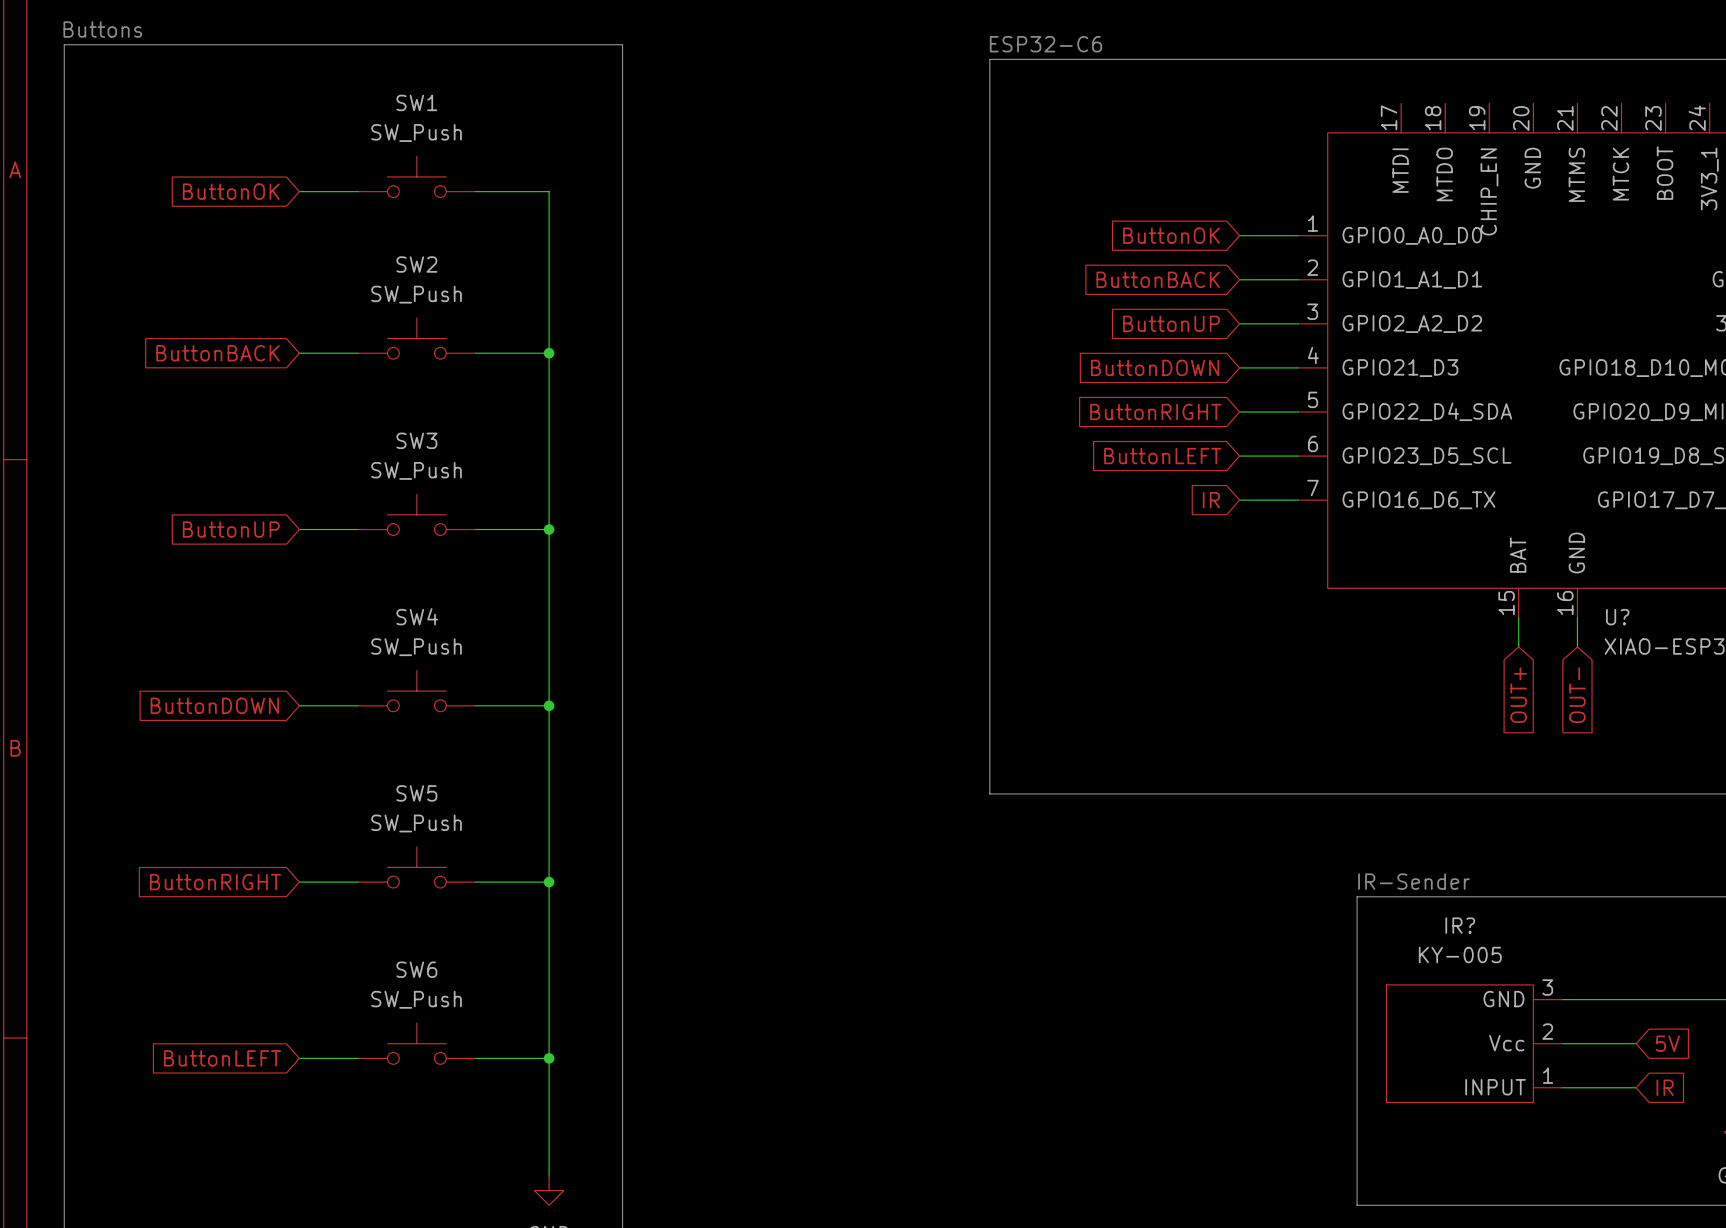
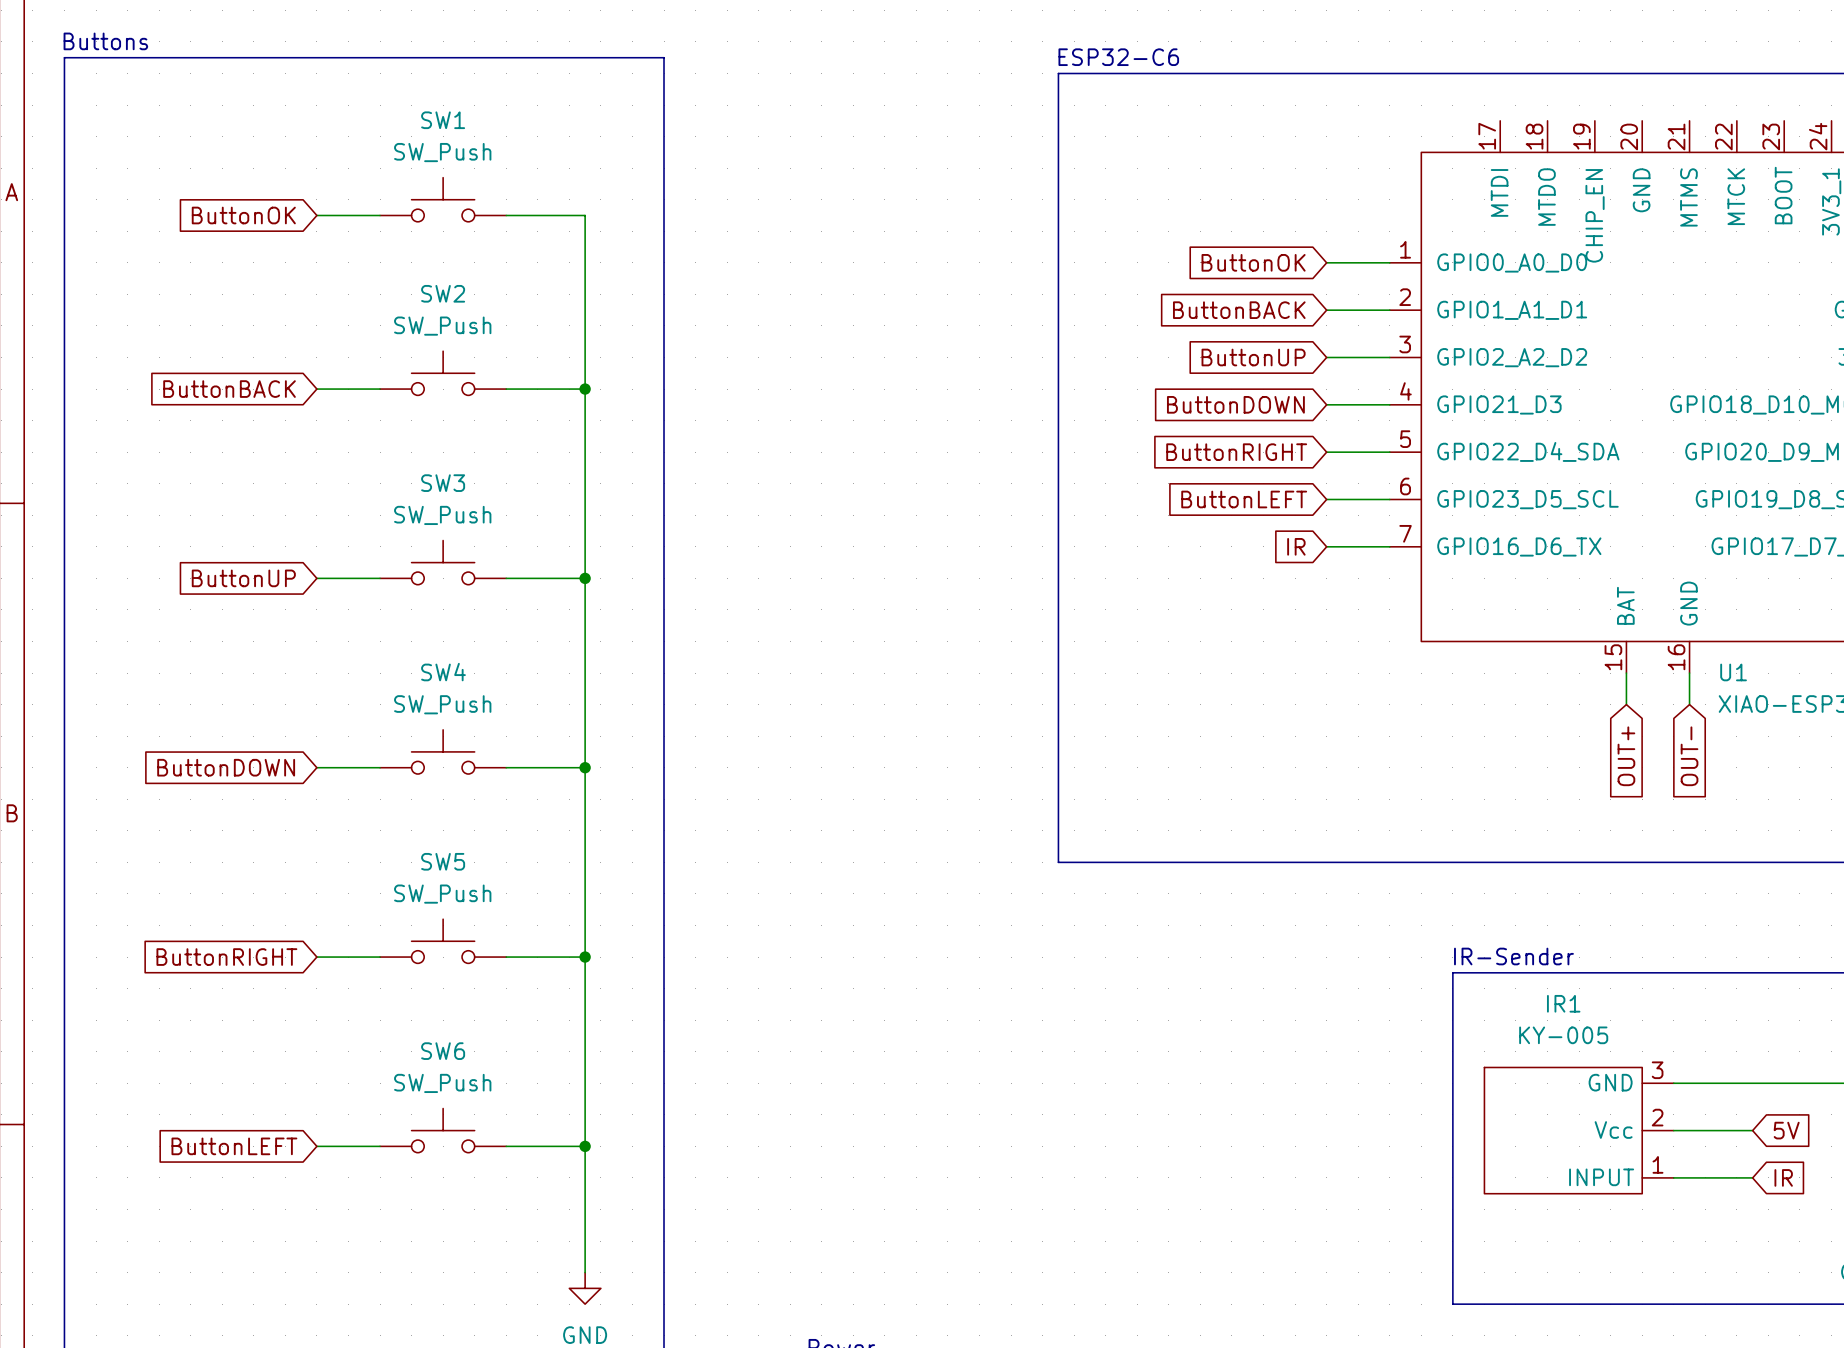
U? name: U? (1617, 617) -> U1 (1733, 672)
IR? name: IR? (1460, 925) -> IR1 (1563, 1003)

